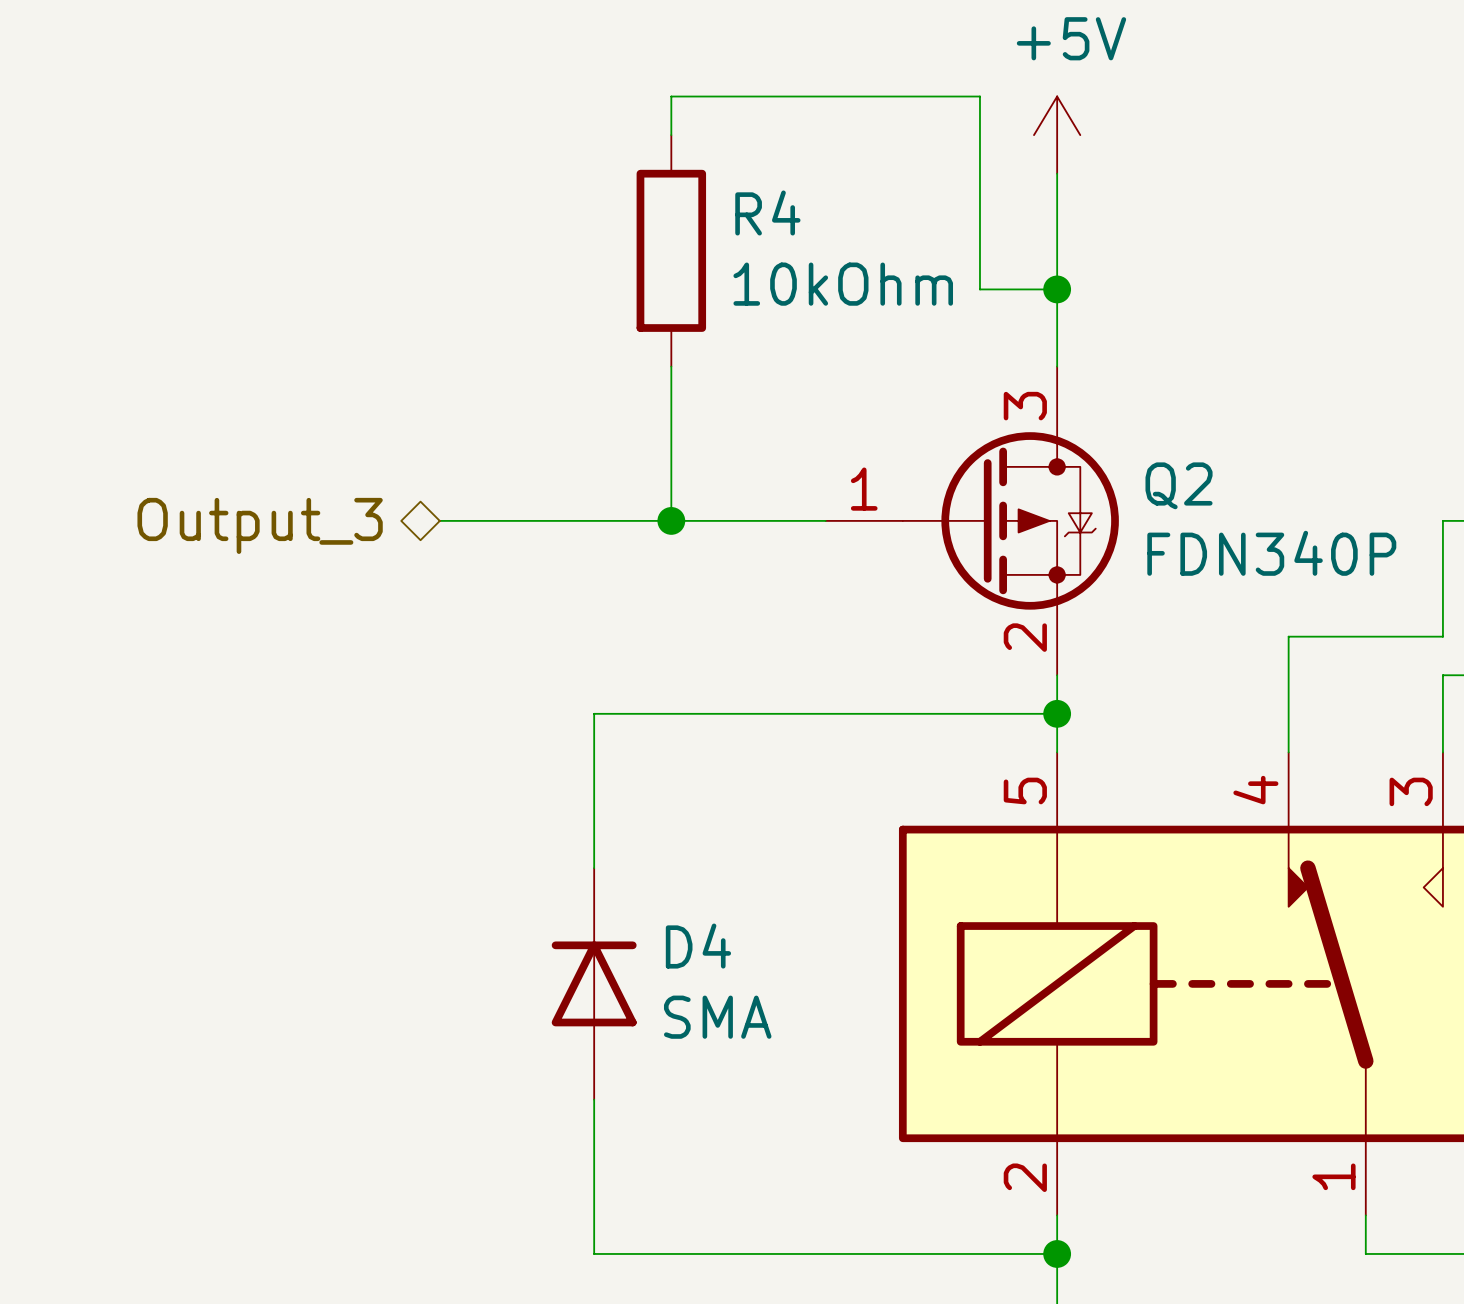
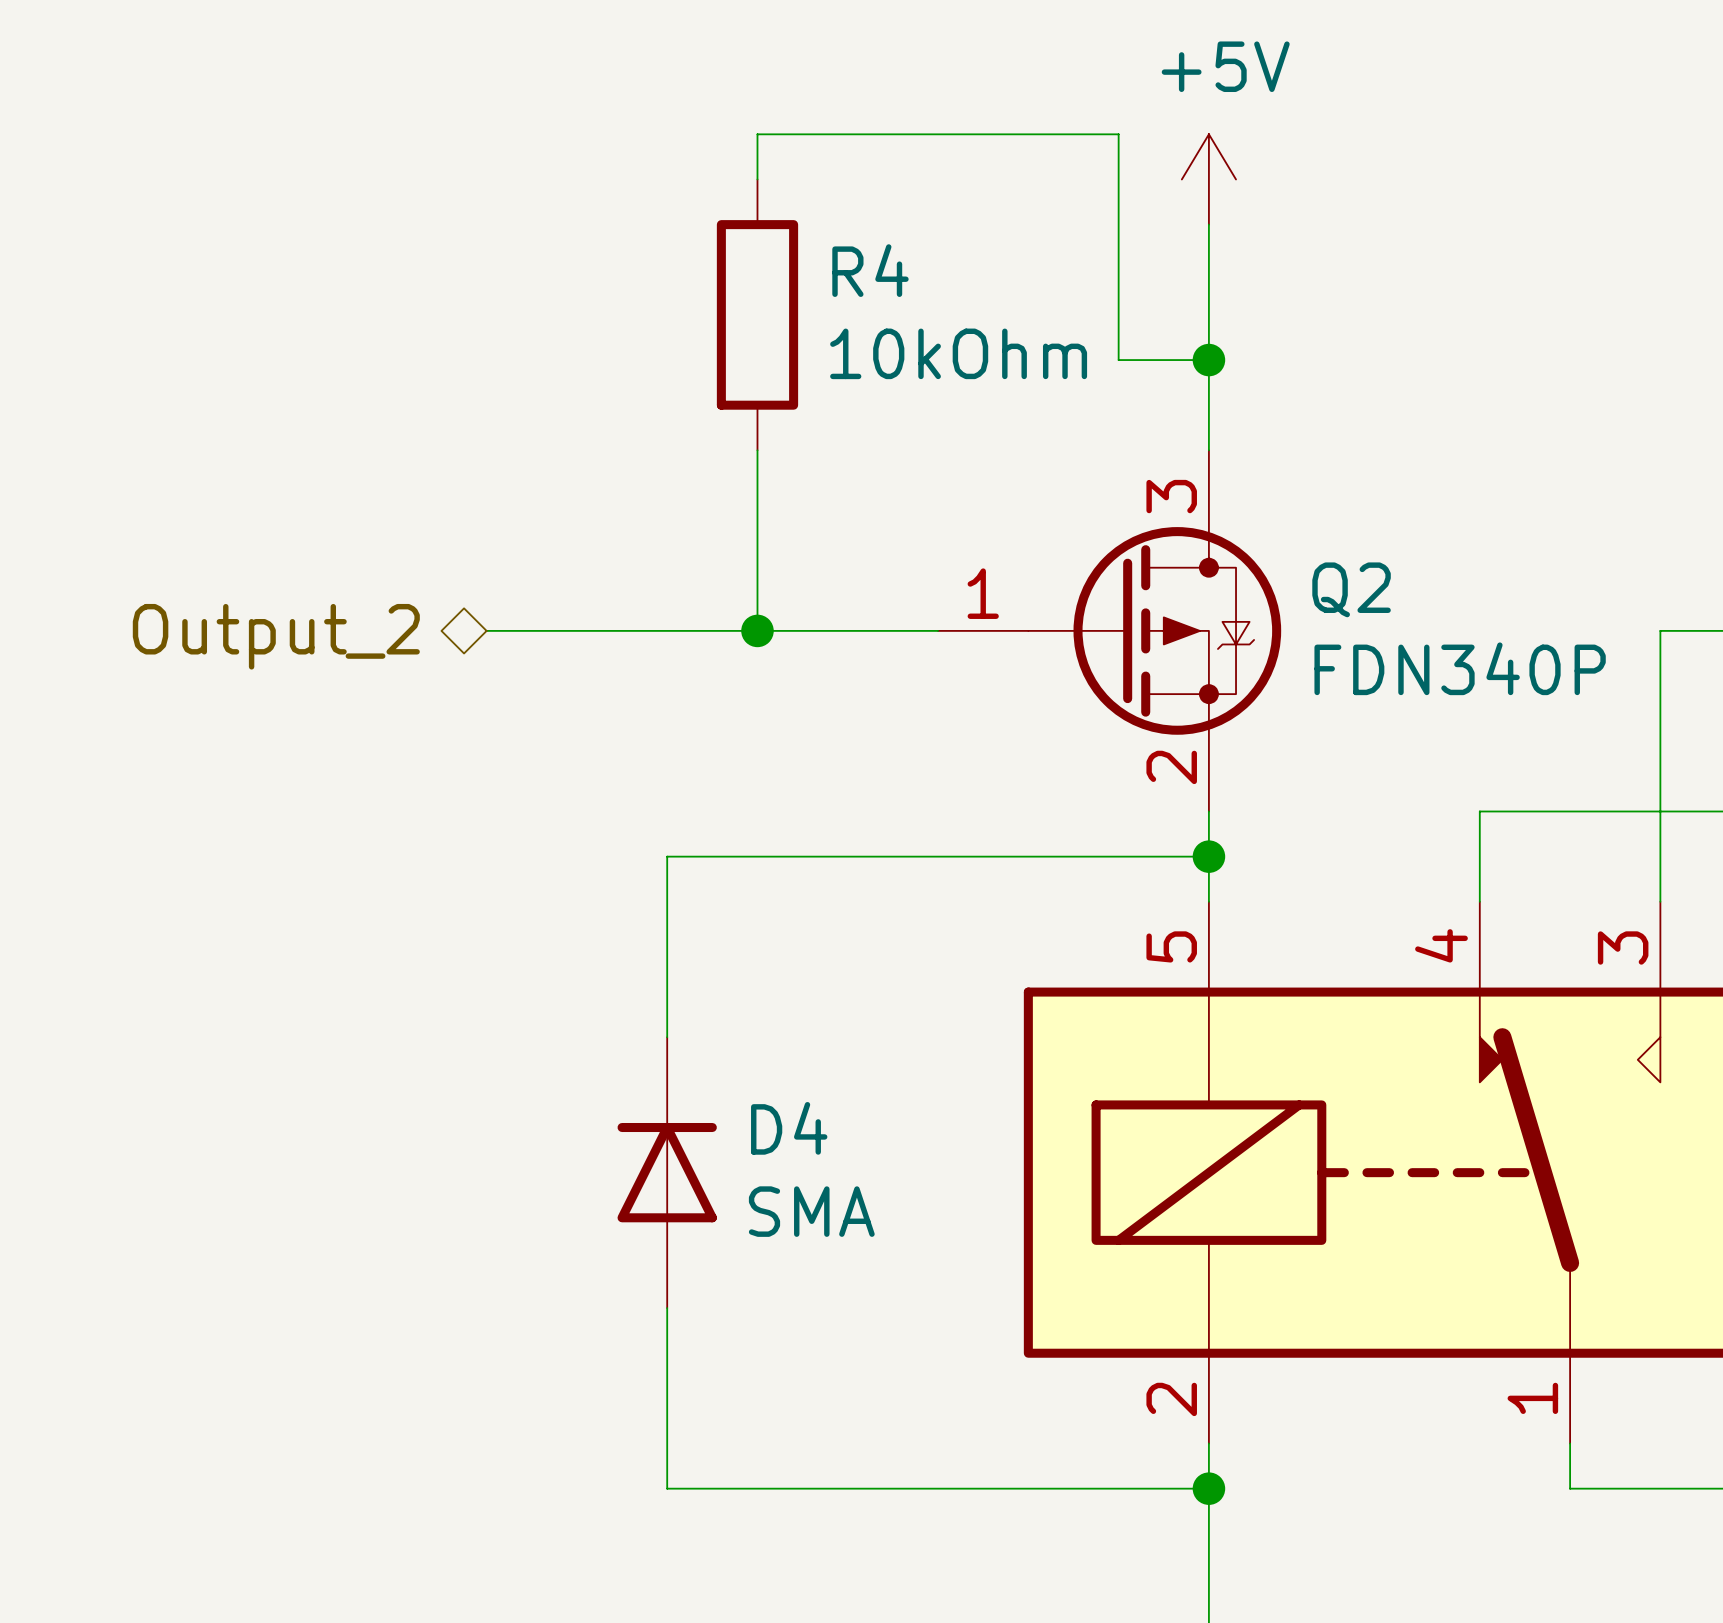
hierarchical label: Output_3 (260, 525) -> Output_2 (276, 636)
wire: (1442, 636) (1288, 636) (1288, 675) -> (1660, 766) (1660, 811) (1479, 811)

